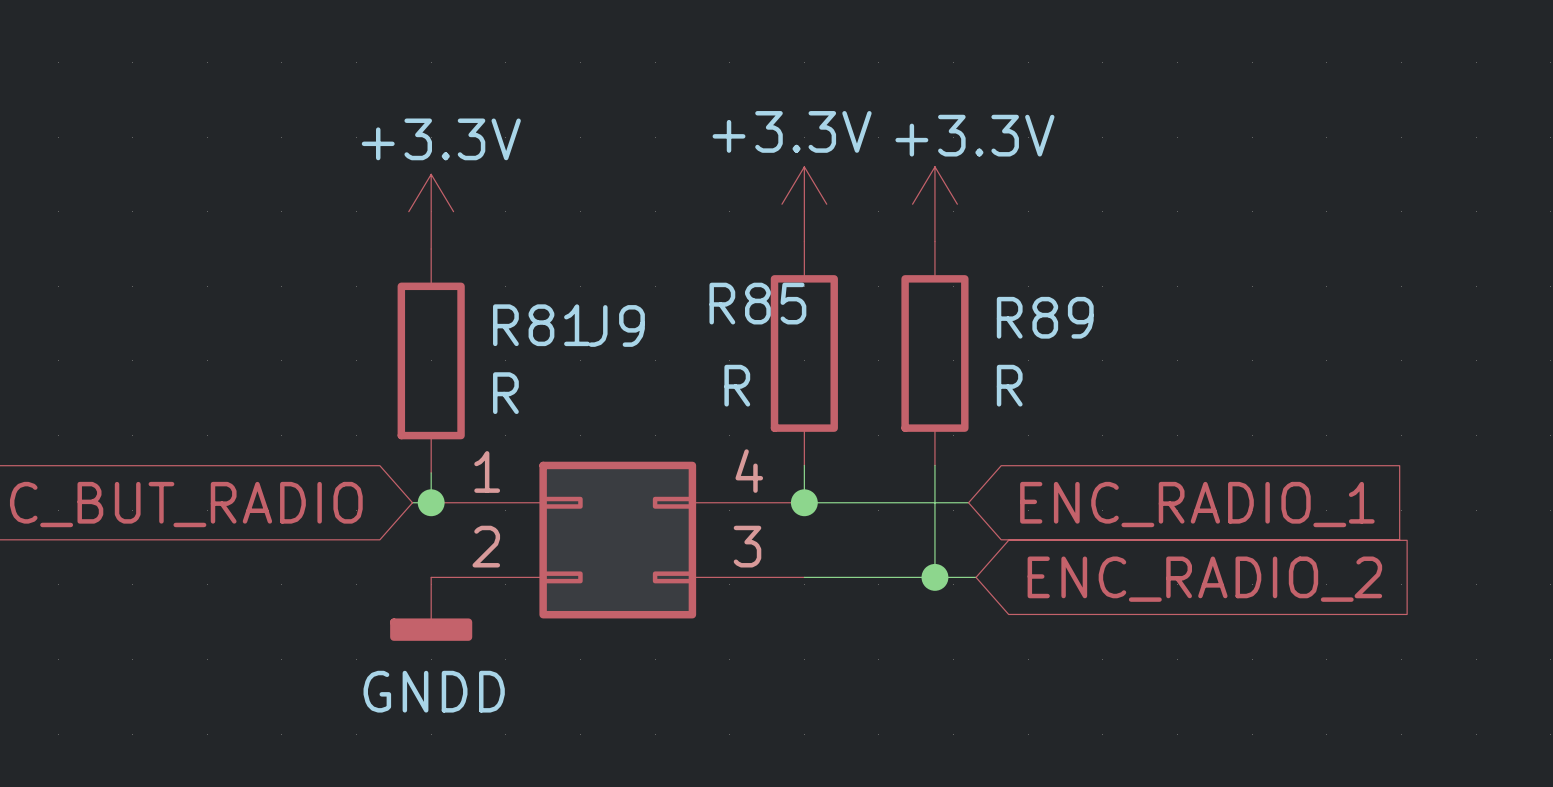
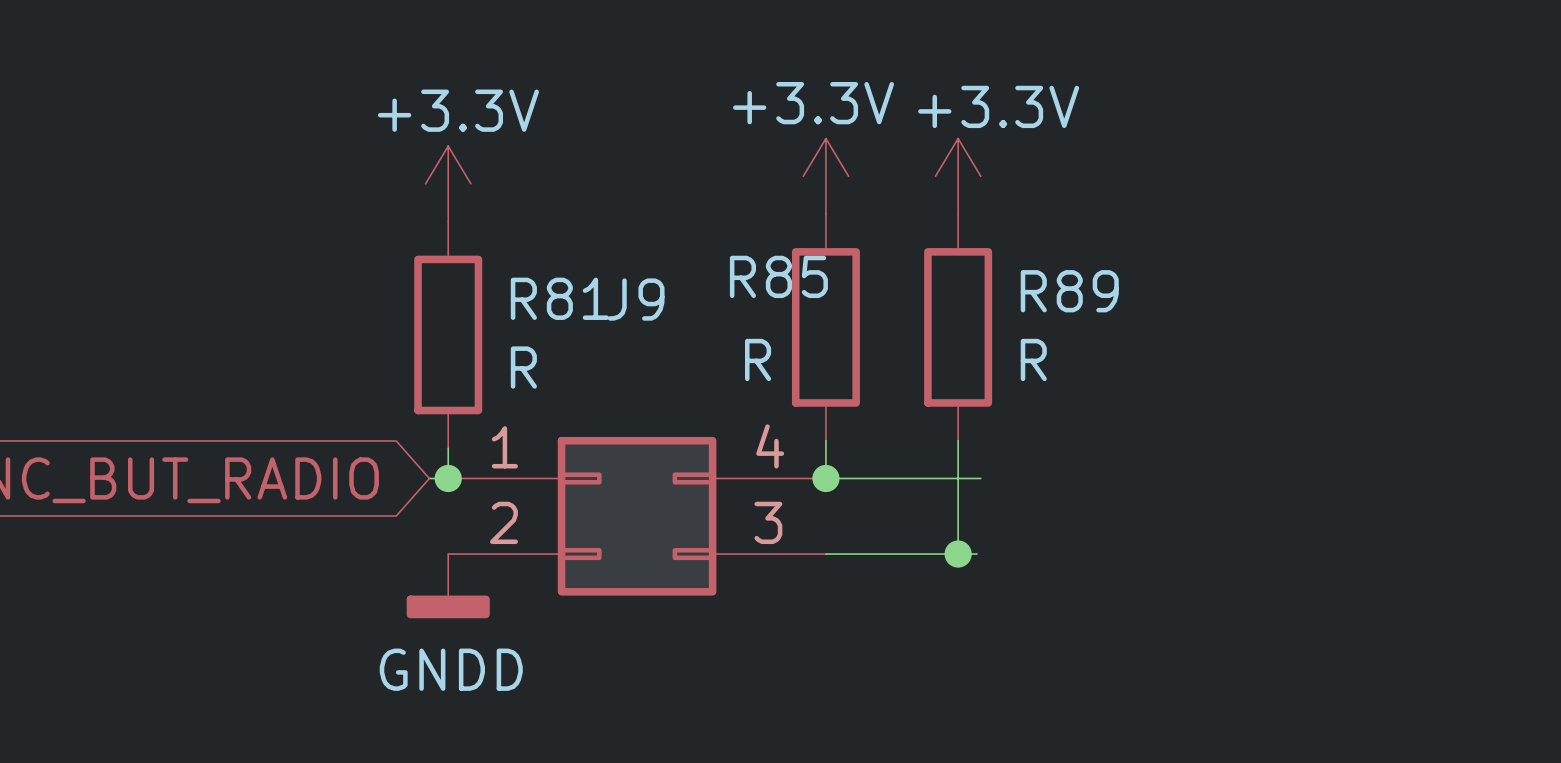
wire: (957, 502) (968, 502) -> none
global label: ENC_RADIO_1 (1197, 504) -> none
wire: (953, 577) (976, 577) -> none
global label: ENC_RADIO_2 (1204, 579) -> none

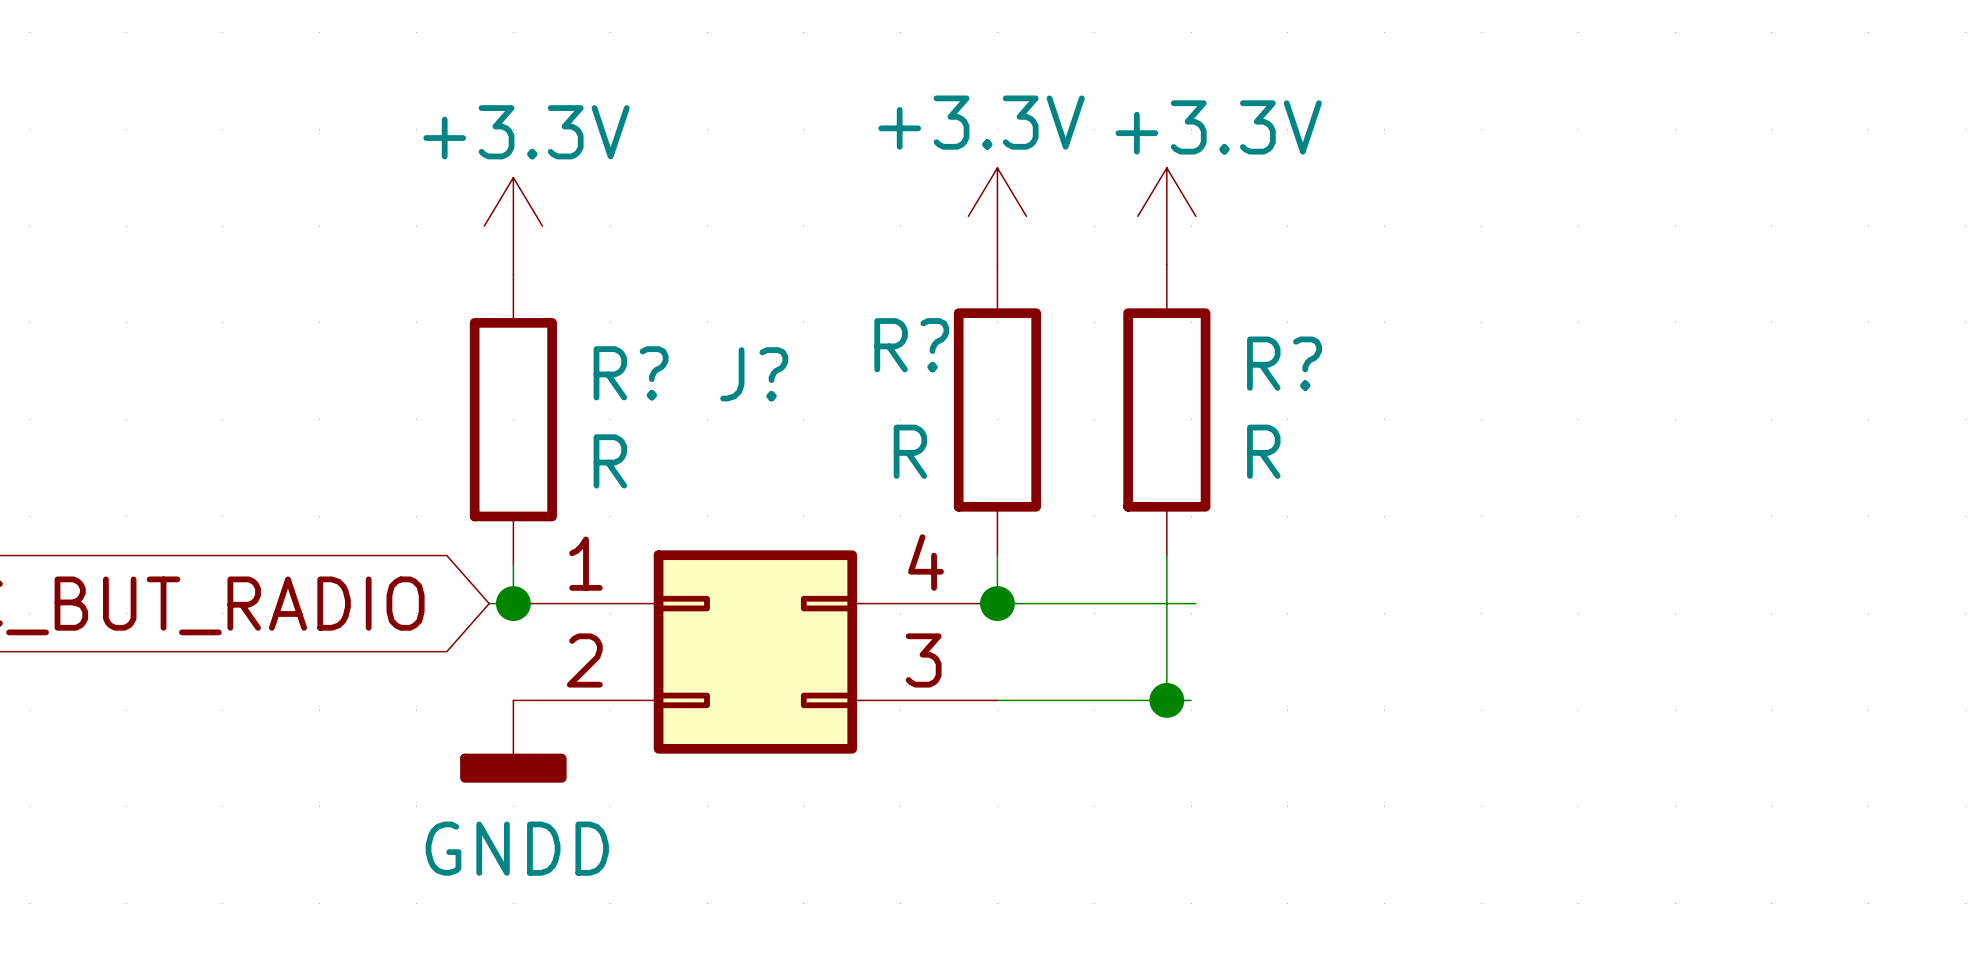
R85 name: R85 (778, 276) -> R? (911, 345)
R89 name: R89 (1069, 291) -> R? (1284, 363)
R81 name: R81 (559, 298) -> R? (631, 373)
J9 name: J9 (636, 299) -> J? (754, 374)

